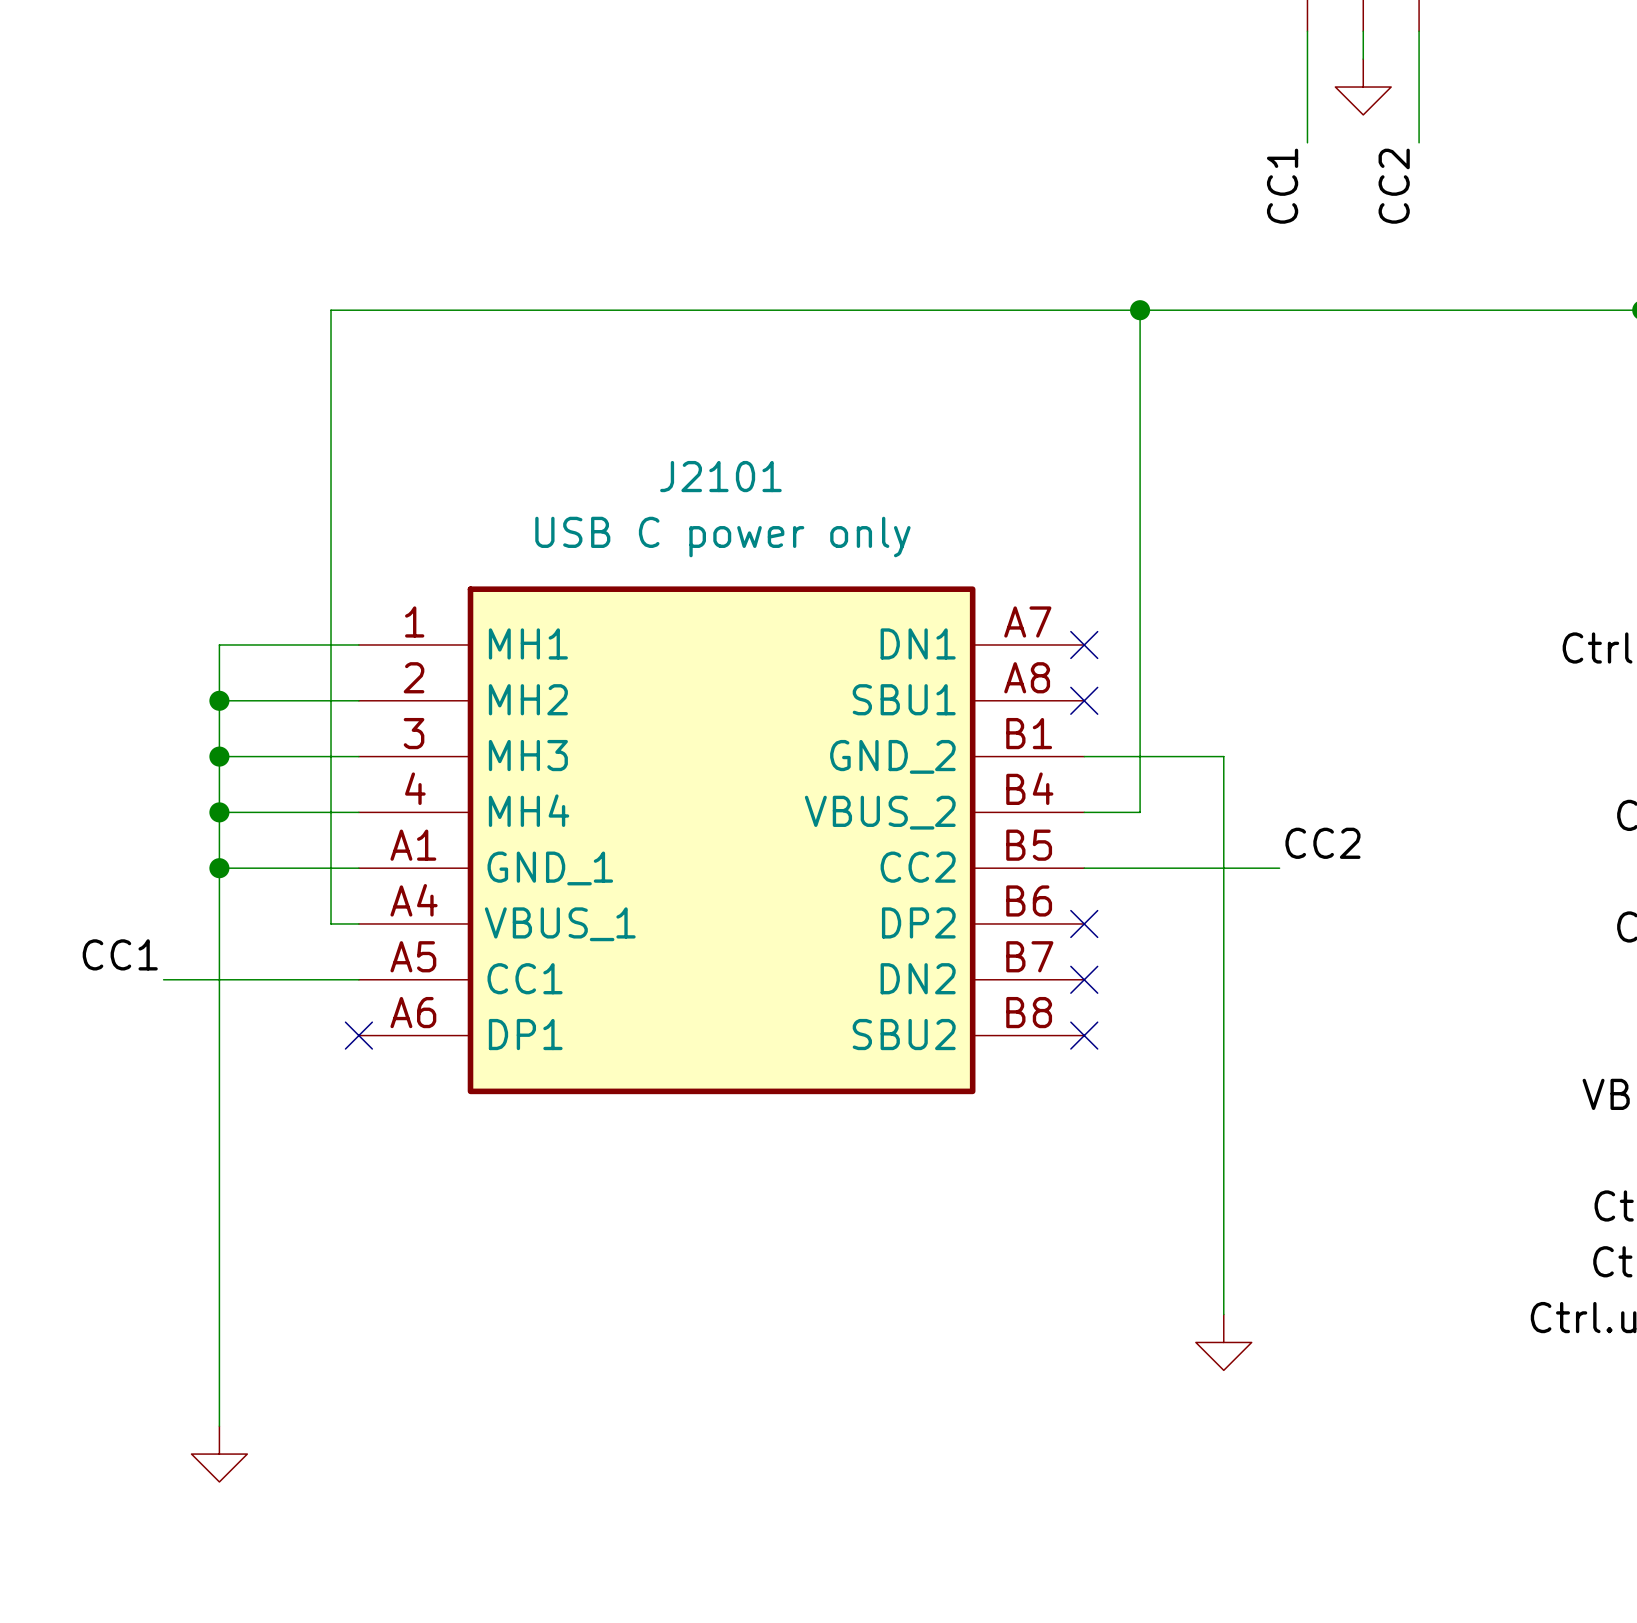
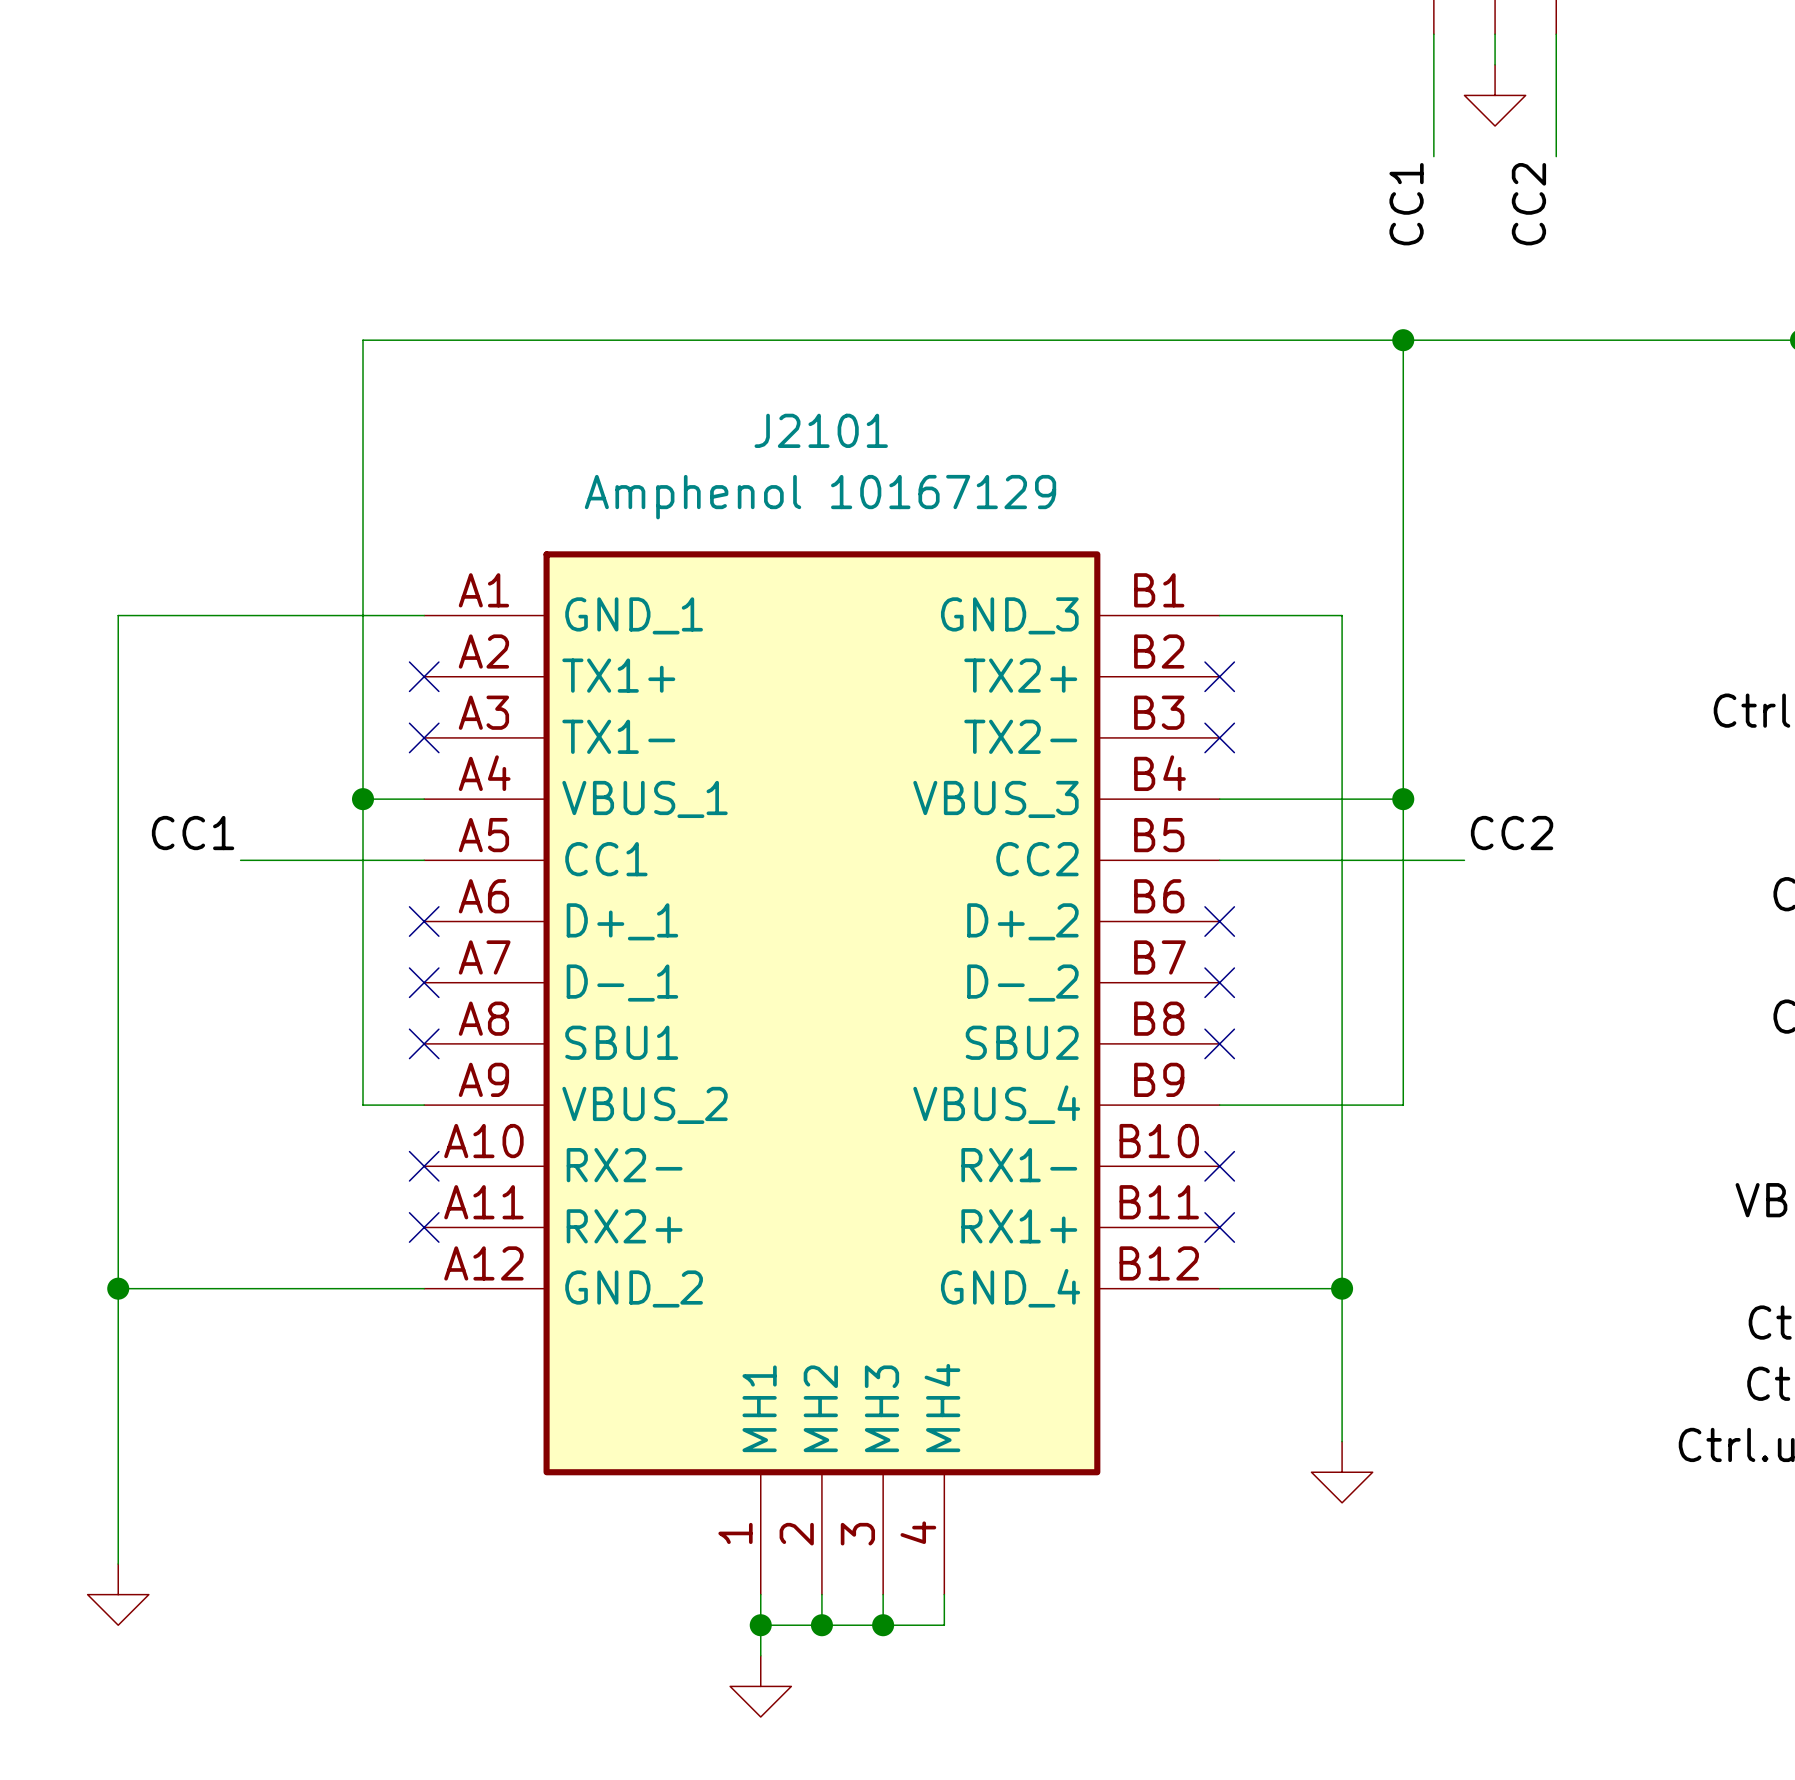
wire: (1140, 310) (1140, 812) (1084, 812) -> none
junction: (1140, 310) -> none
wire: none -> (1403, 340) (1403, 1105) (1219, 1105)
junction: none -> (1403, 340)
J2101 name position: J2101 (720, 476) -> J2101 (821, 430)
J2101 value: USB C power only (722, 537) -> Amphenol 10167129 (820, 497)
wire: none -> (424, 615) (118, 615) (118, 1564)
J2101 symbol: [358, 586, 1085, 1095] -> [424, 551, 1220, 1595]
no-connect mark: none -> (424, 676)
no-connect mark: none -> (1219, 676)
wire: (358, 644) (219, 644) (219, 1426) -> none
no-connect mark: (1084, 644) -> none
no-connect mark: none -> (424, 737)
no-connect mark: none -> (1219, 737)
wire: (219, 700) (358, 700) -> none
junction: (219, 700) -> none
no-connect mark: (1084, 700) -> none
wire: none -> (363, 799) (424, 799)
junction: none -> (363, 799)
wire: none -> (1219, 799) (1403, 799)
junction: none -> (1403, 799)
wire: (219, 756) (358, 756) -> none
junction: (219, 756) -> none
wire: (1084, 756) (1223, 756) -> (1219, 615) (1342, 615) (1342, 829)
wire: none -> (240, 860) (424, 860)
wire: none -> (1219, 860) (1464, 860)
wire: (219, 812) (358, 812) -> none
junction: (219, 812) -> none
no-connect mark: none -> (424, 921)
no-connect mark: none -> (1219, 921)
label position: CC2 (1322, 843) -> CC2 (1512, 833)
wire: (219, 868) (358, 868) -> none
junction: (219, 868) -> none
wire: (1084, 868) (1279, 868) -> none
no-connect mark: none -> (424, 982)
no-connect mark: none -> (1219, 982)
wire: (331, 923) (358, 923) -> (363, 1013) (363, 1105) (424, 1105)
no-connect mark: (1084, 923) -> none
no-connect mark: none -> (424, 1043)
no-connect mark: none -> (1219, 1043)
label position: CC1 (120, 954) -> CC1 (193, 833)
wire: (163, 979) (358, 979) -> none
no-connect mark: (1084, 979) -> none
no-connect mark position: (358, 1035) -> (424, 1166)
no-connect mark position: (1084, 1035) -> (1219, 1166)
no-connect mark: none -> (424, 1227)
no-connect mark: none -> (1219, 1227)
wire: none -> (118, 1288) (424, 1288)
junction: none -> (118, 1288)
wire: none -> (1219, 1288) (1342, 1288)
junction: none -> (1342, 1288)
power symbol position: (219, 1454) -> (118, 1594)
wire: none -> (760, 1594) (760, 1655)
wire: none -> (821, 1594) (821, 1625)
wire: none -> (883, 1594) (883, 1625)
wire: none -> (944, 1594) (944, 1625) (760, 1625)
junction: none -> (760, 1625)
junction: none -> (821, 1625)
junction: none -> (883, 1625)
power symbol: none -> (760, 1686)

